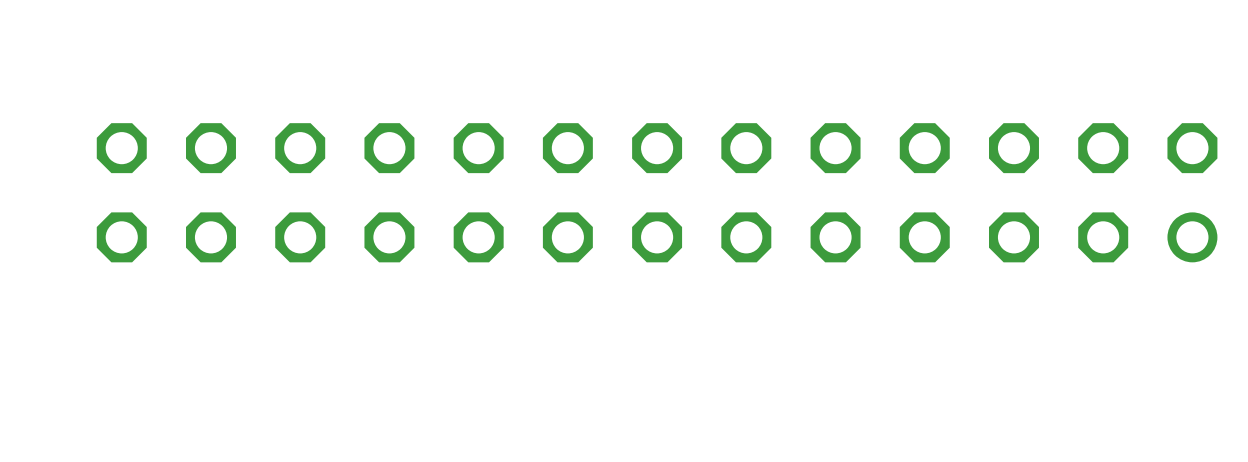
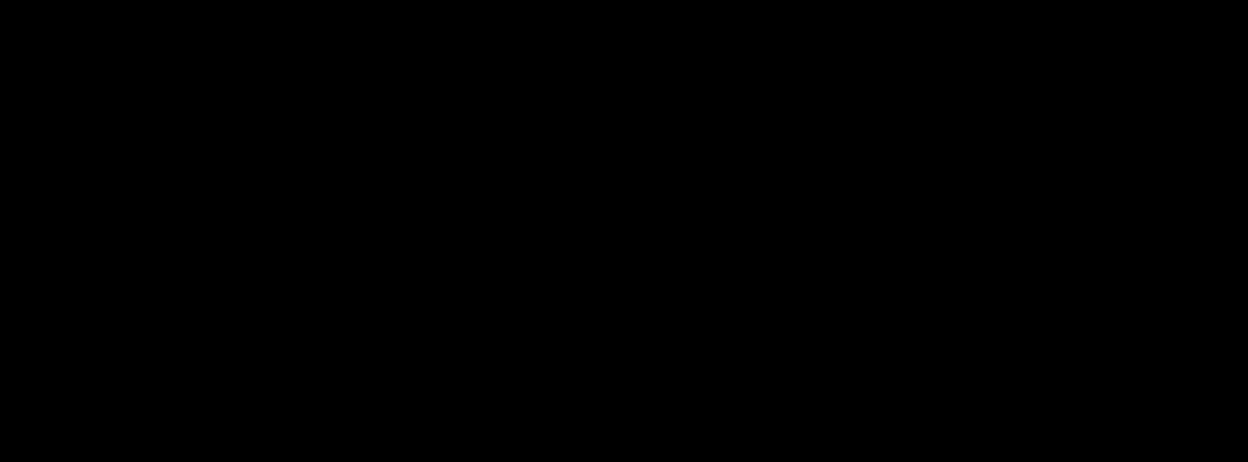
part: (657, 192) -> none

